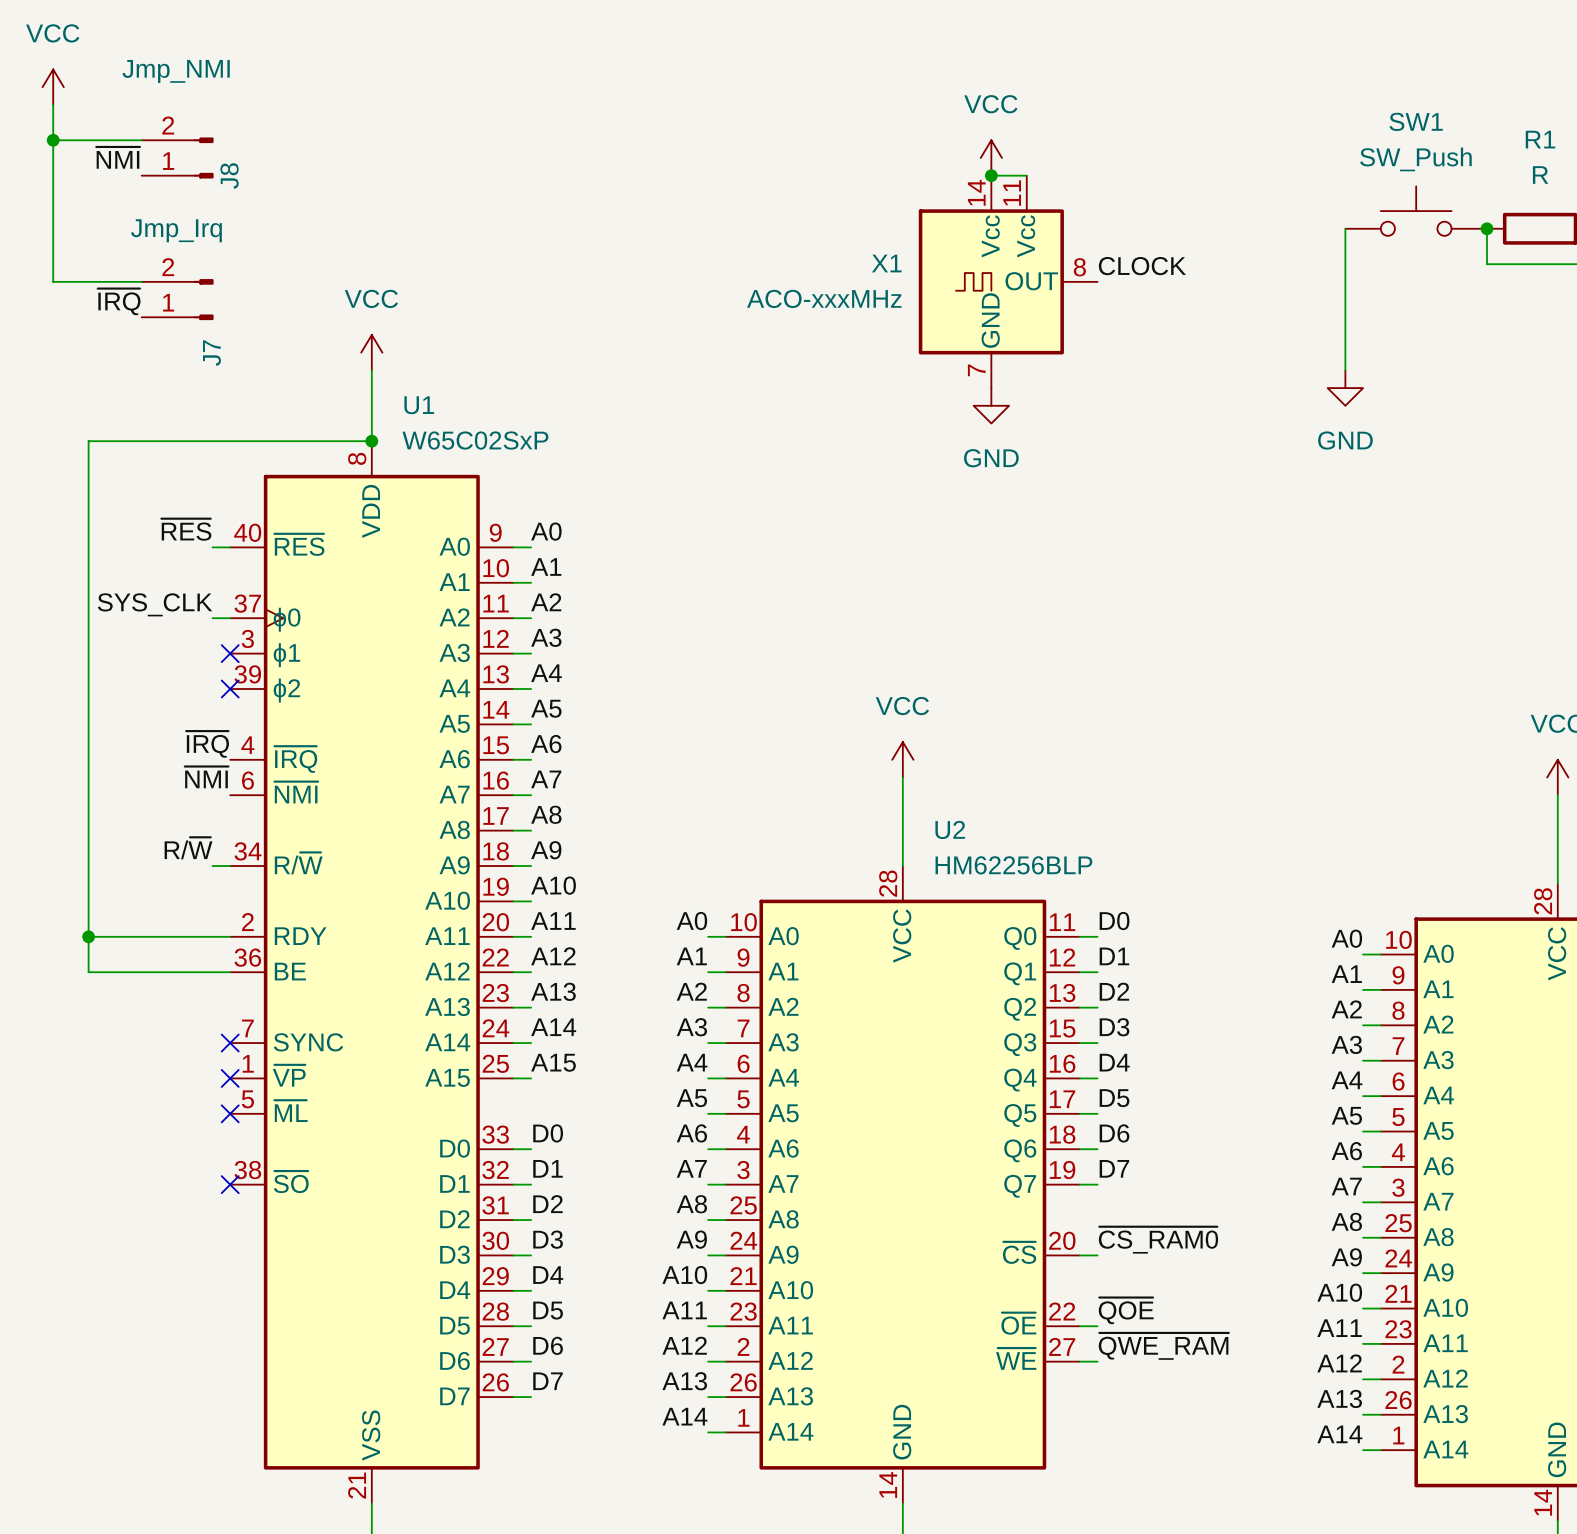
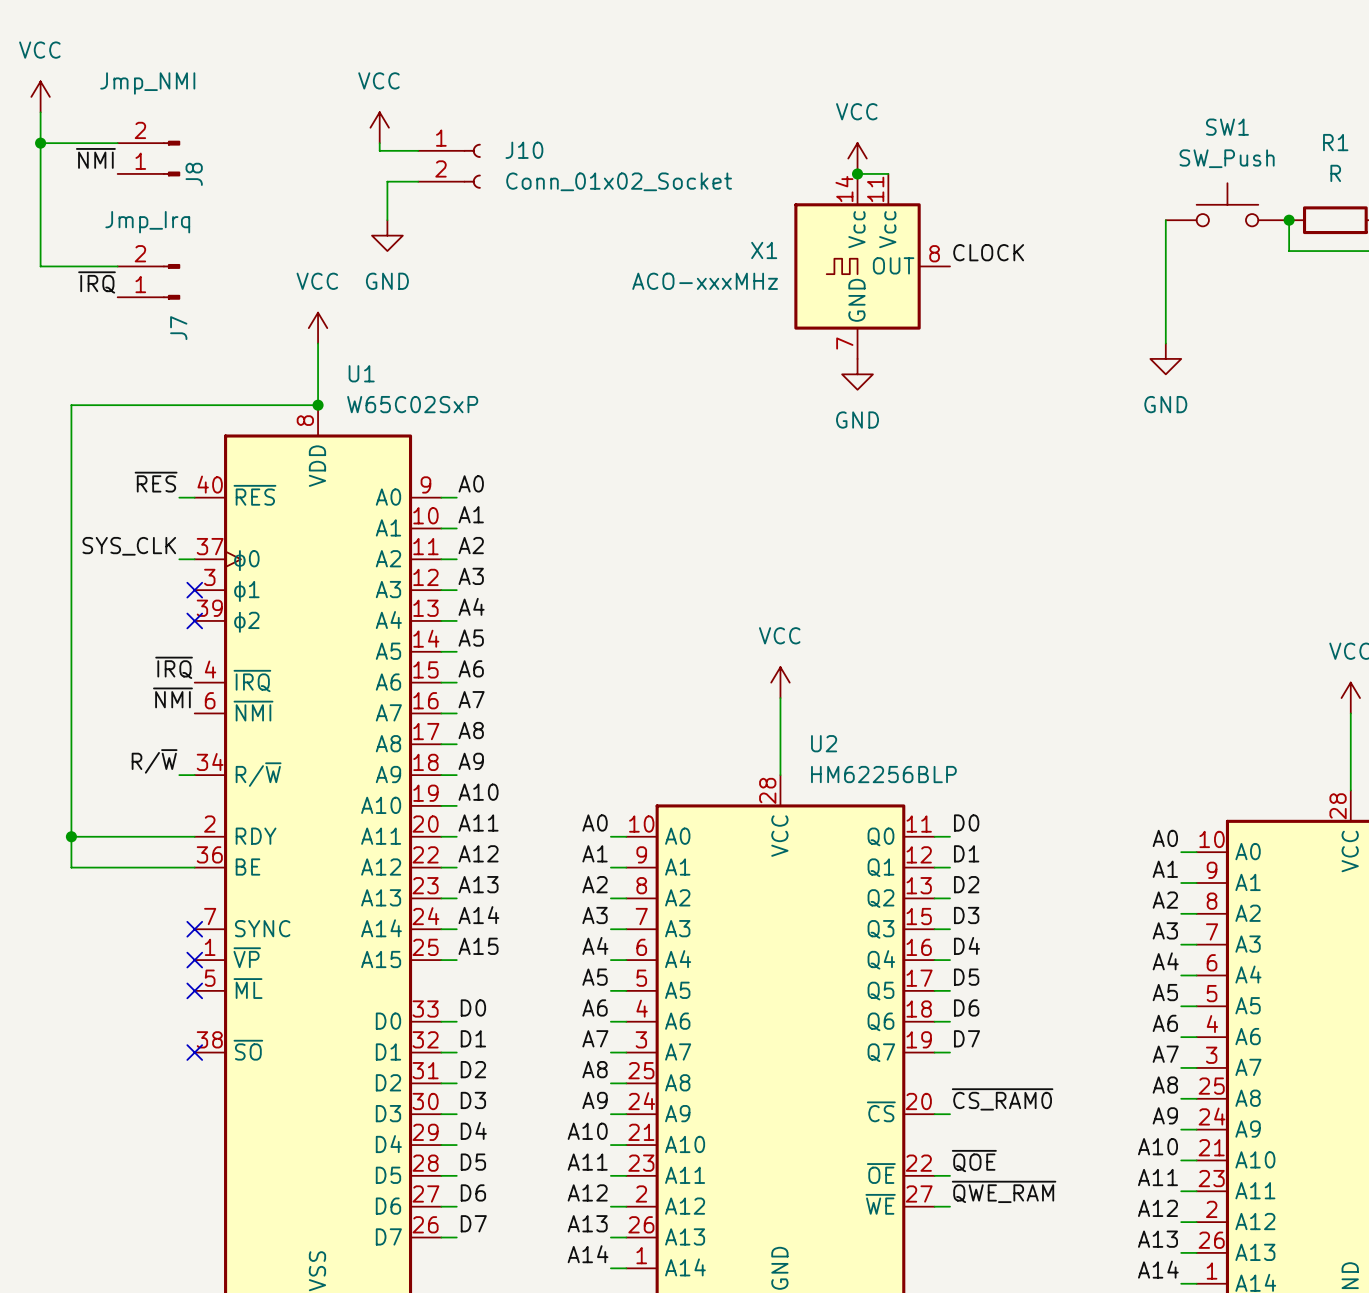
power symbol: none -> VCC (379, 127)
wire: none -> (379, 143) (379, 150) (418, 150)
J10: none -> Conn_01x02_Socket (449, 166)
wire: none -> (418, 181) (387, 181) (387, 220)
power symbol: none -> GND (387, 235)

